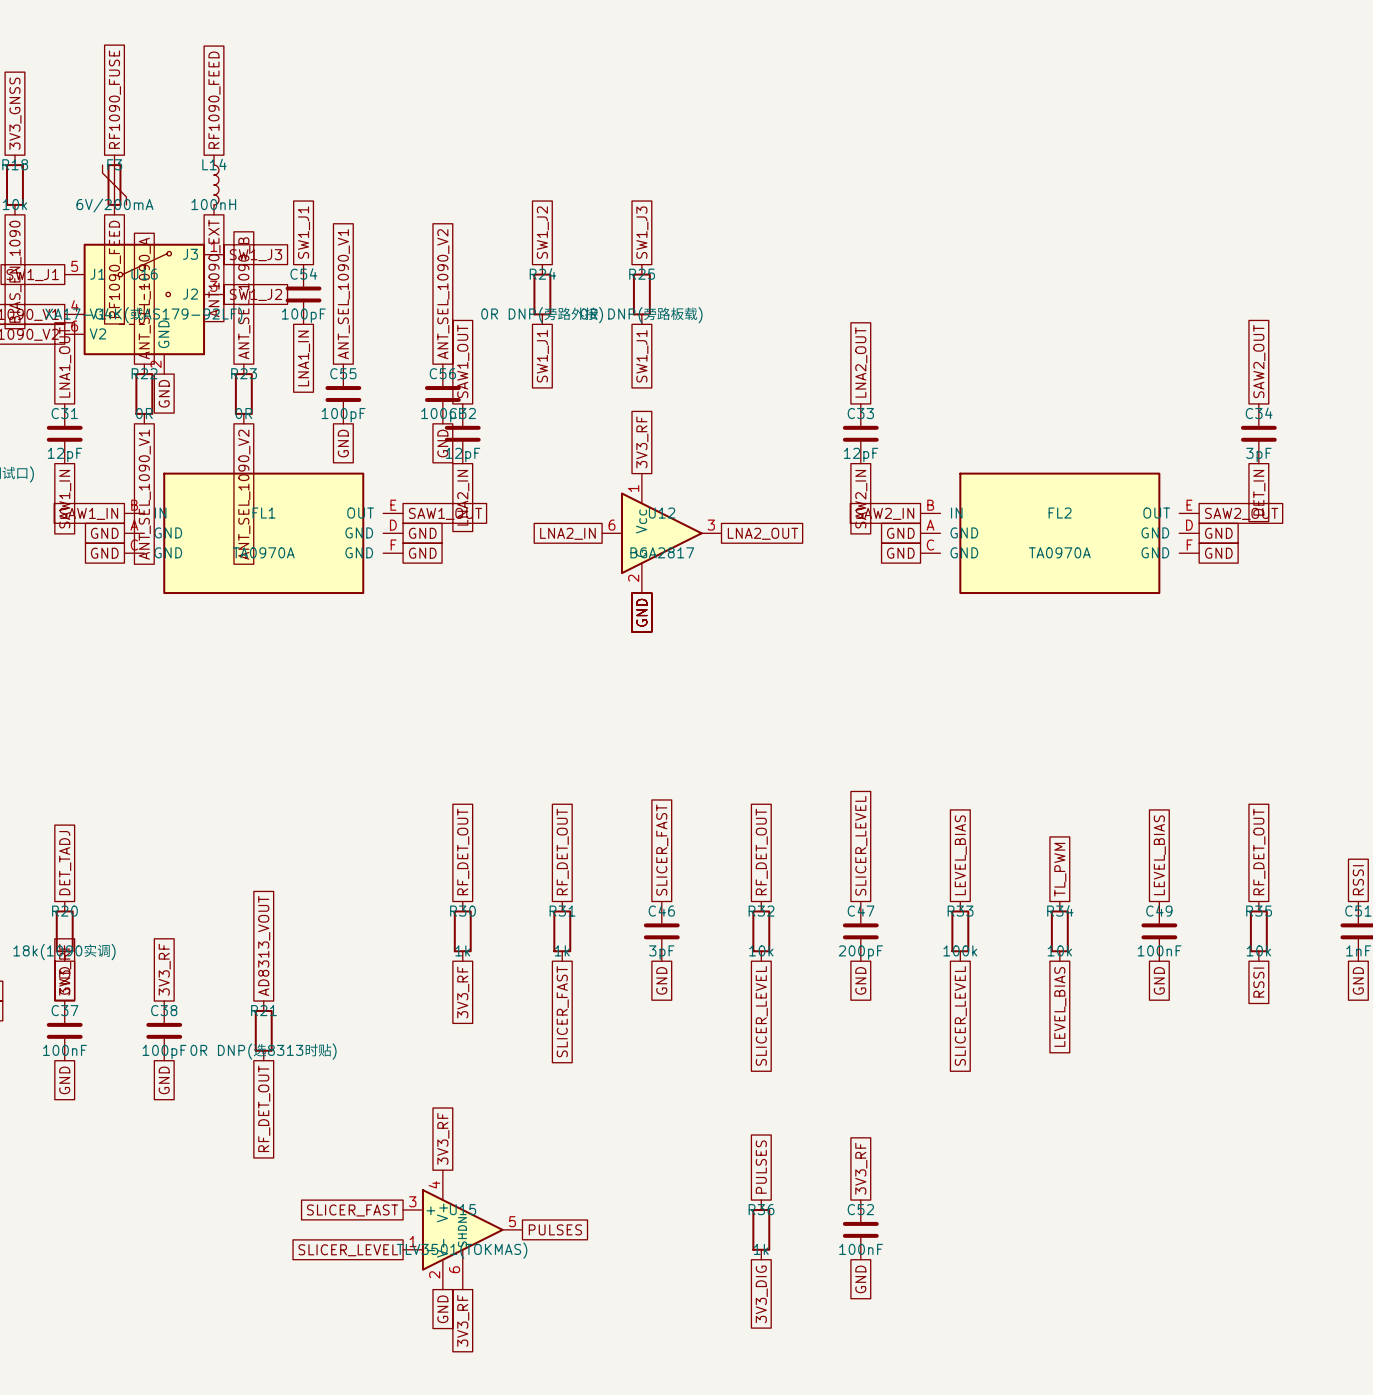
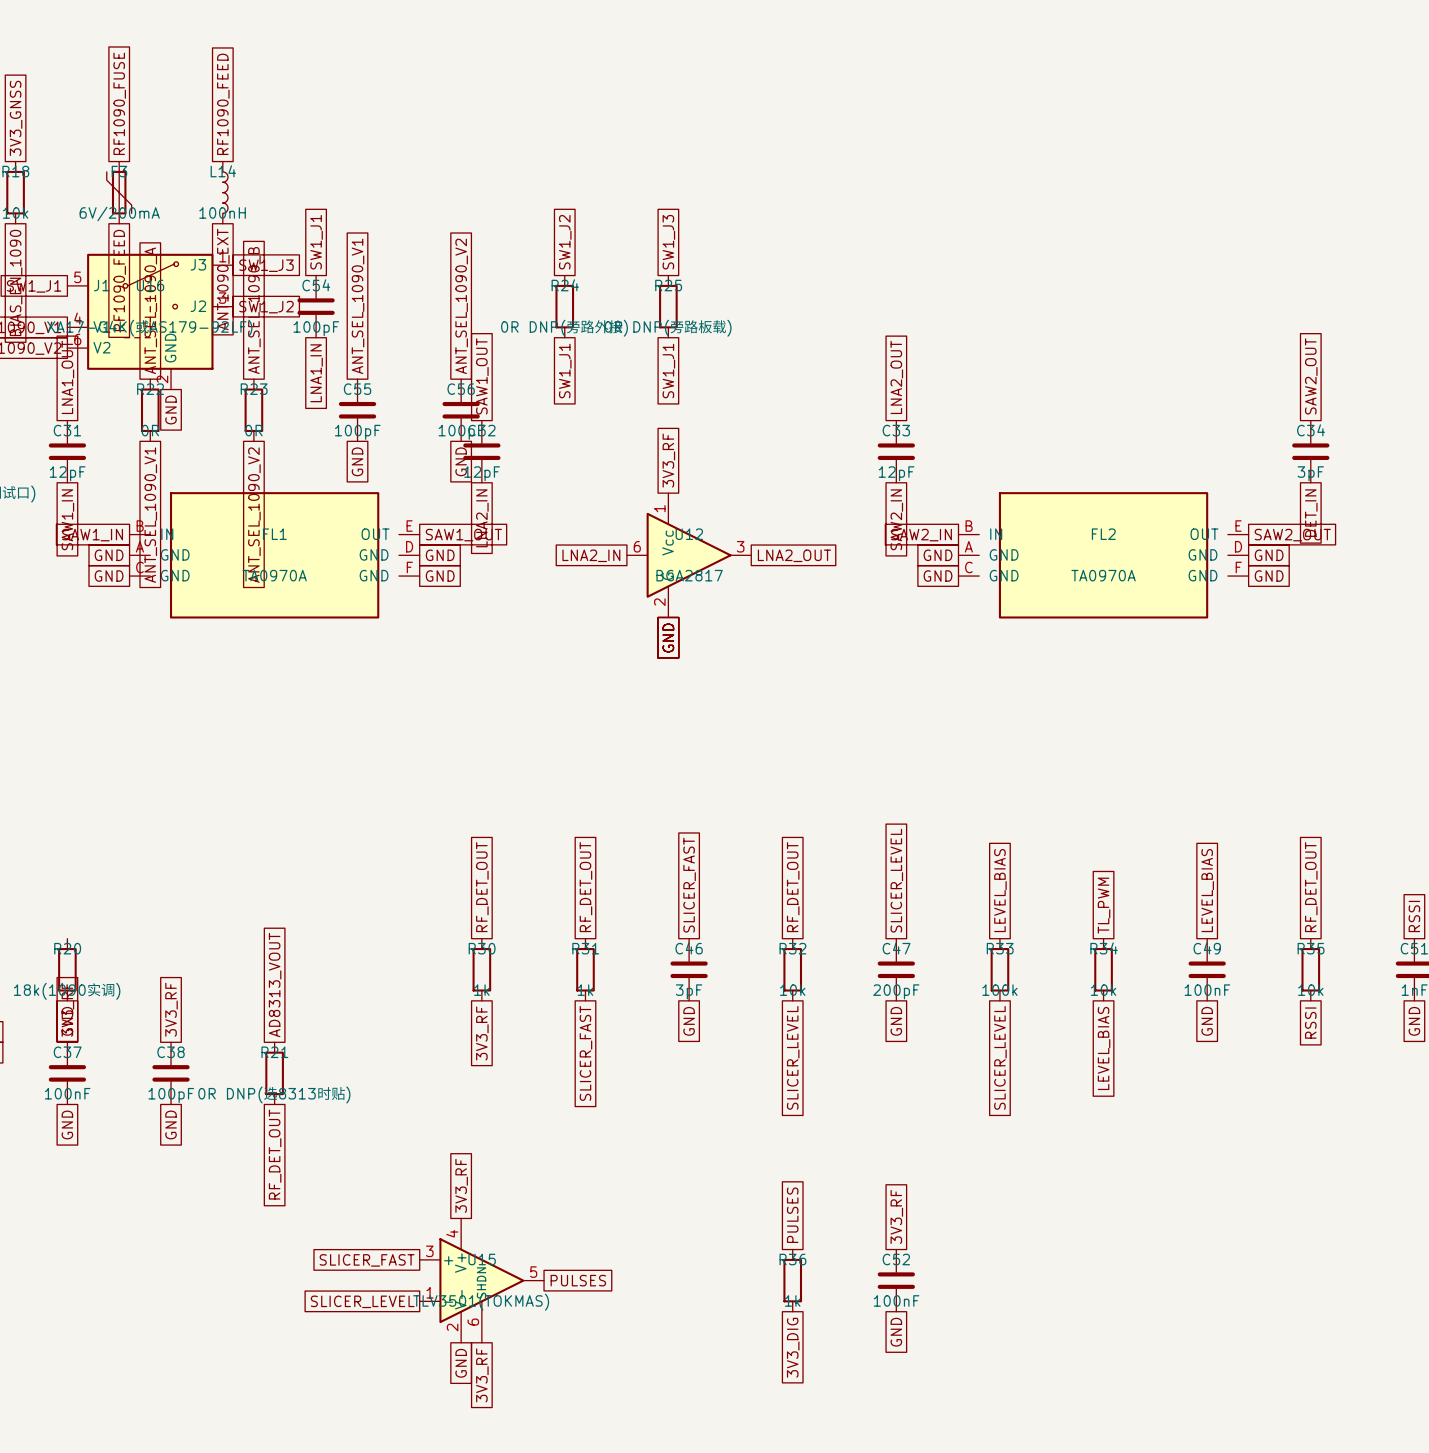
global label: DET_TADJ (65, 863) -> none

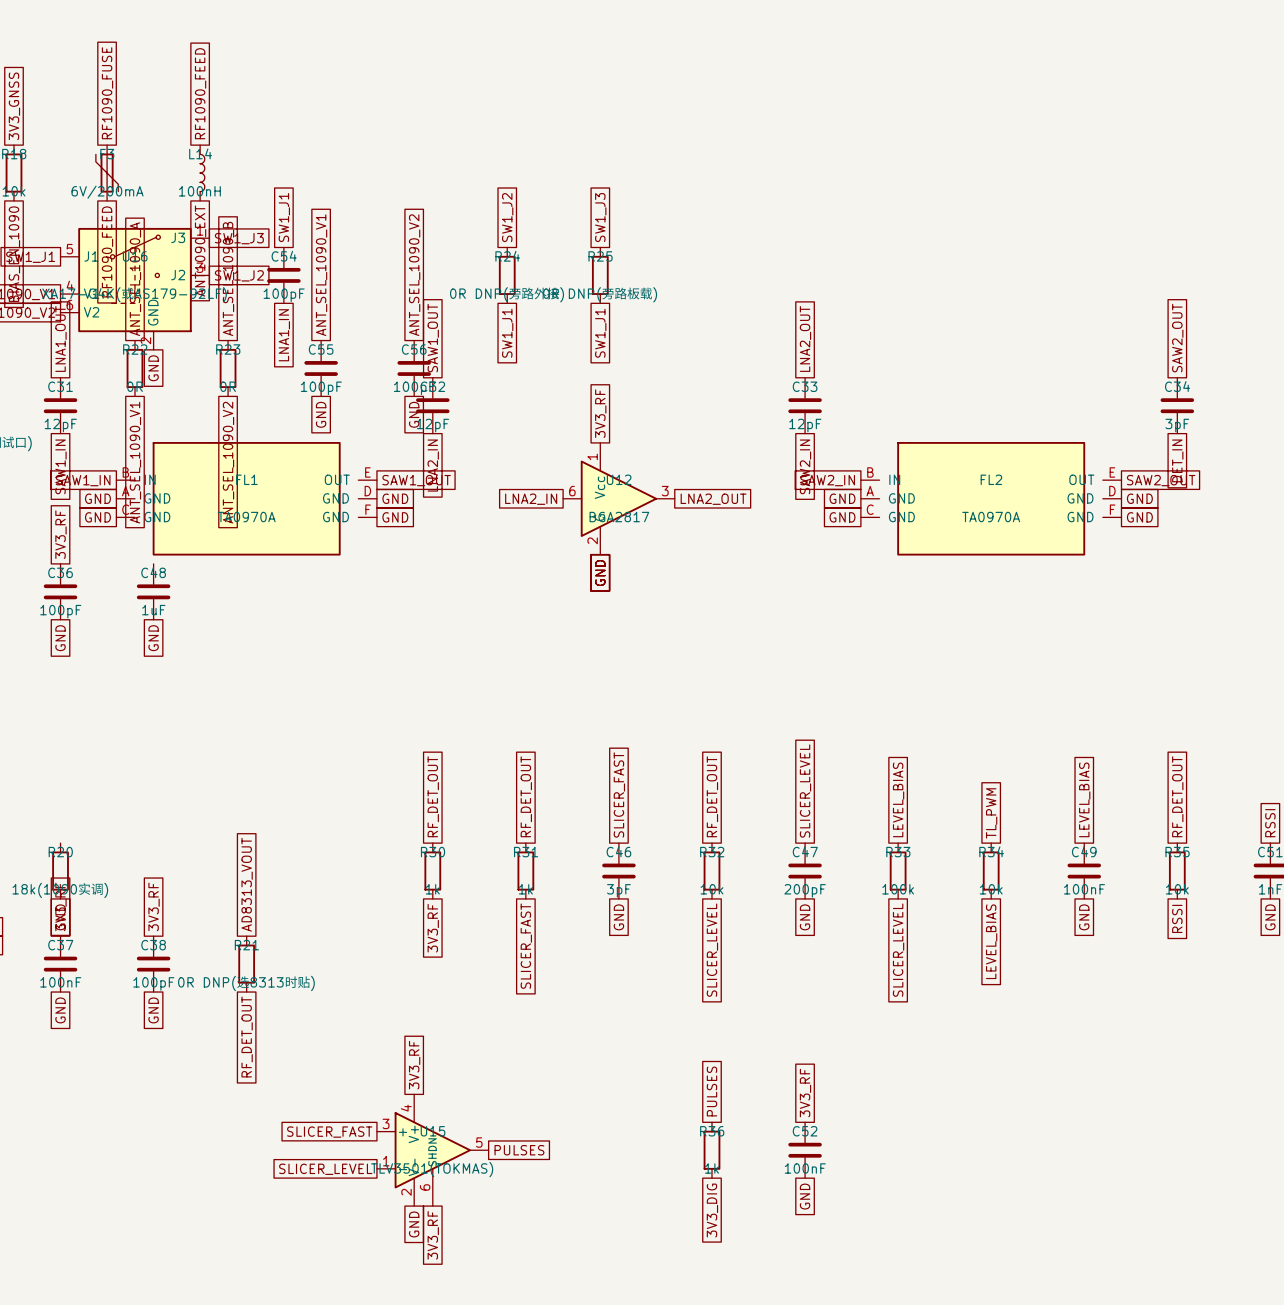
global label: none -> 3V3_RF (60, 534)
C36: none -> 100pF (60, 591)
C48: none -> 1uF (153, 591)
global label: none -> GND (60, 638)
global label: none -> GND (153, 638)

